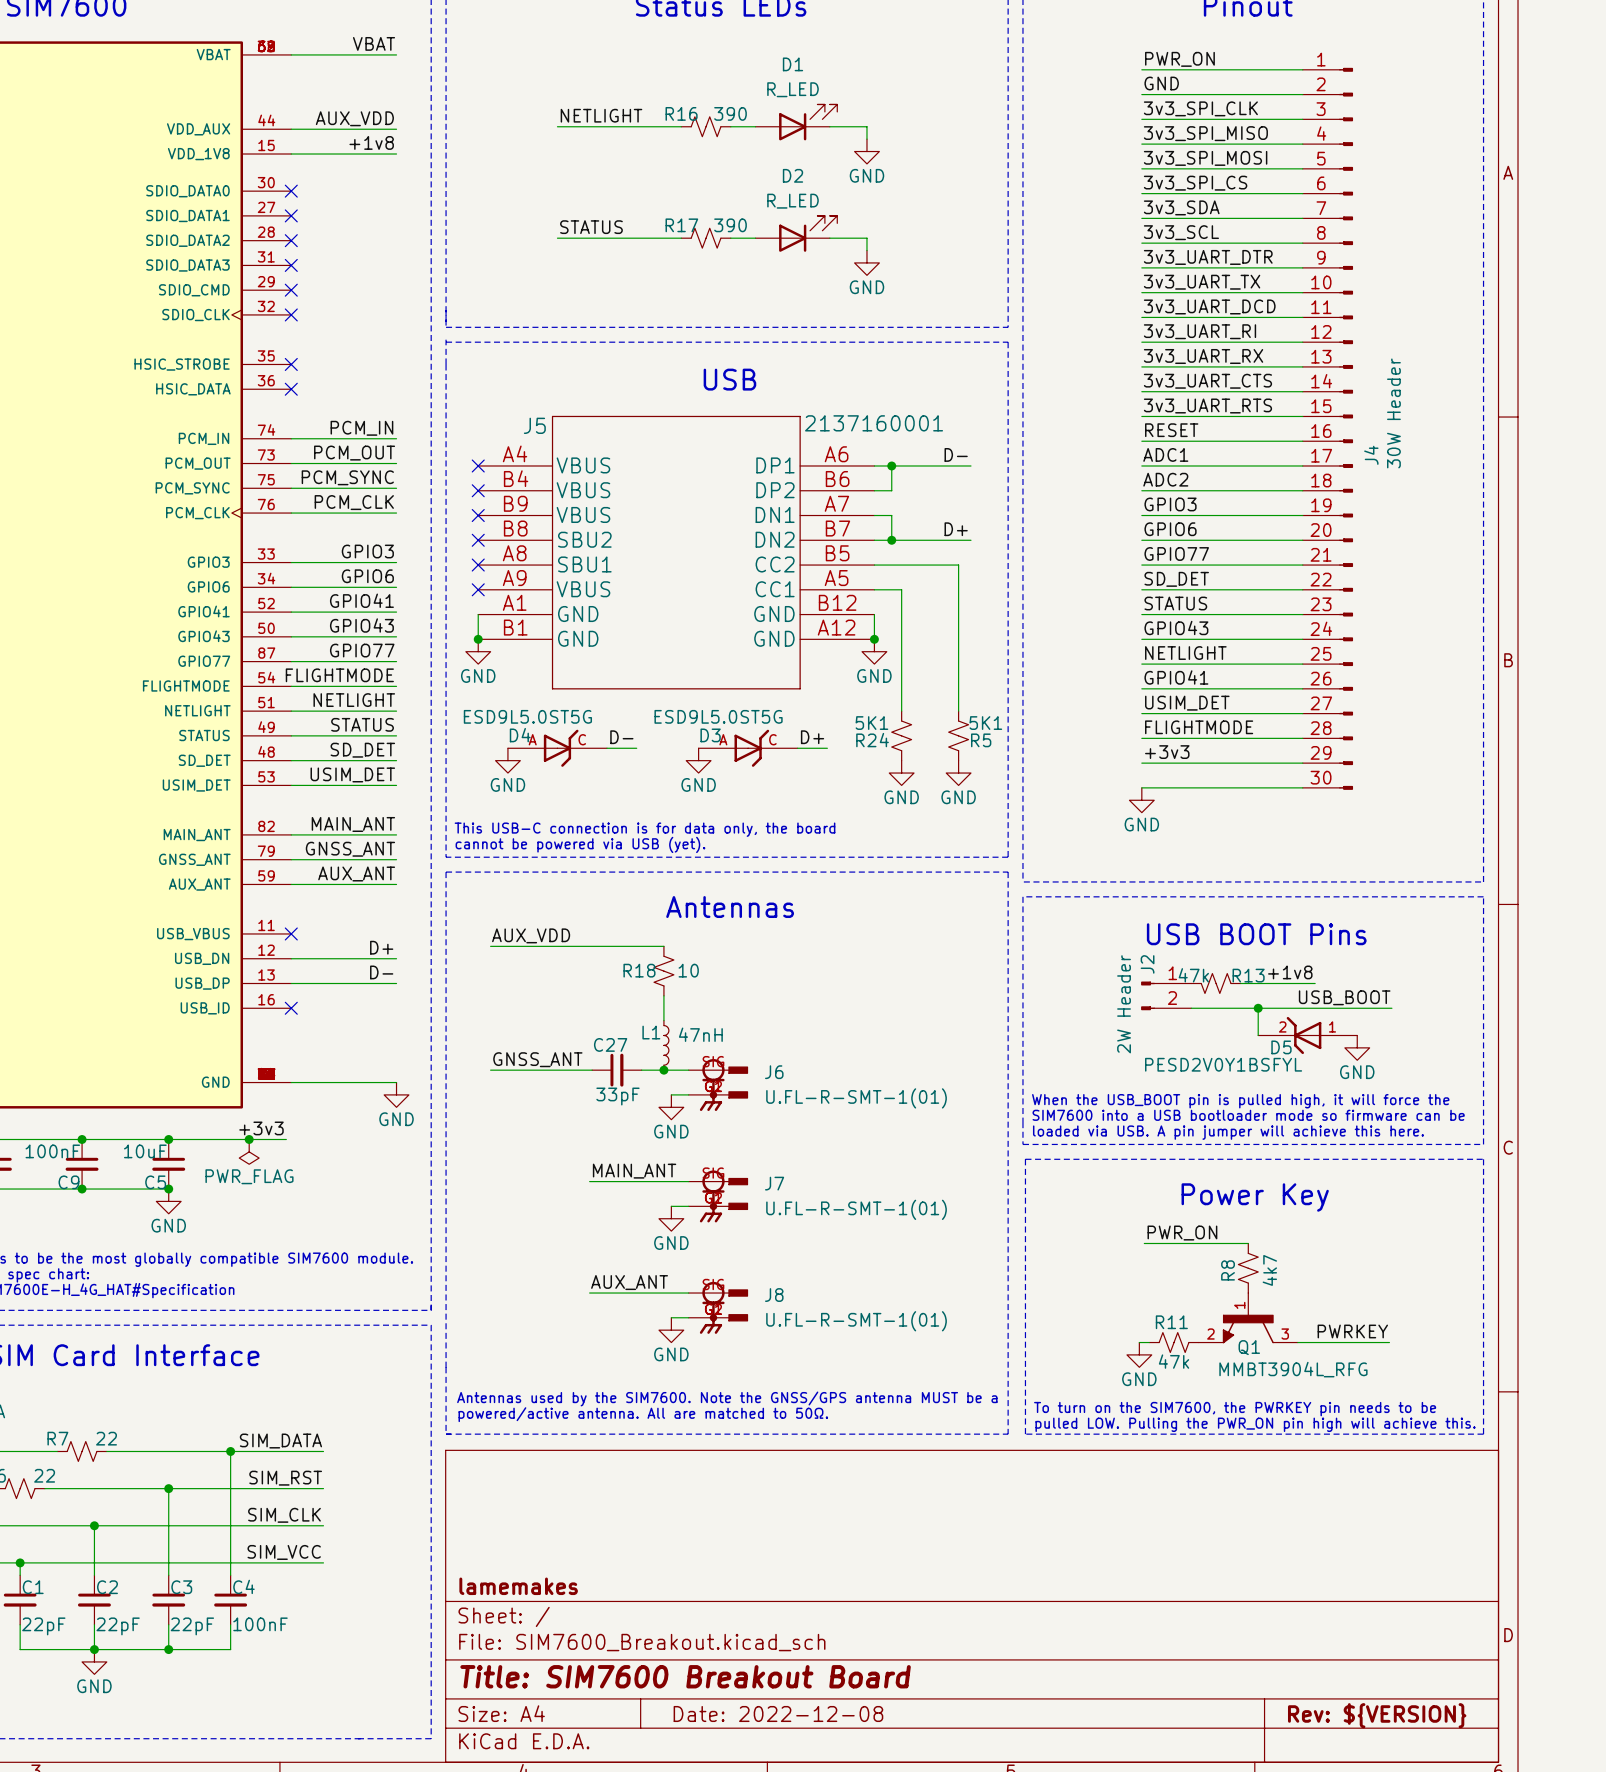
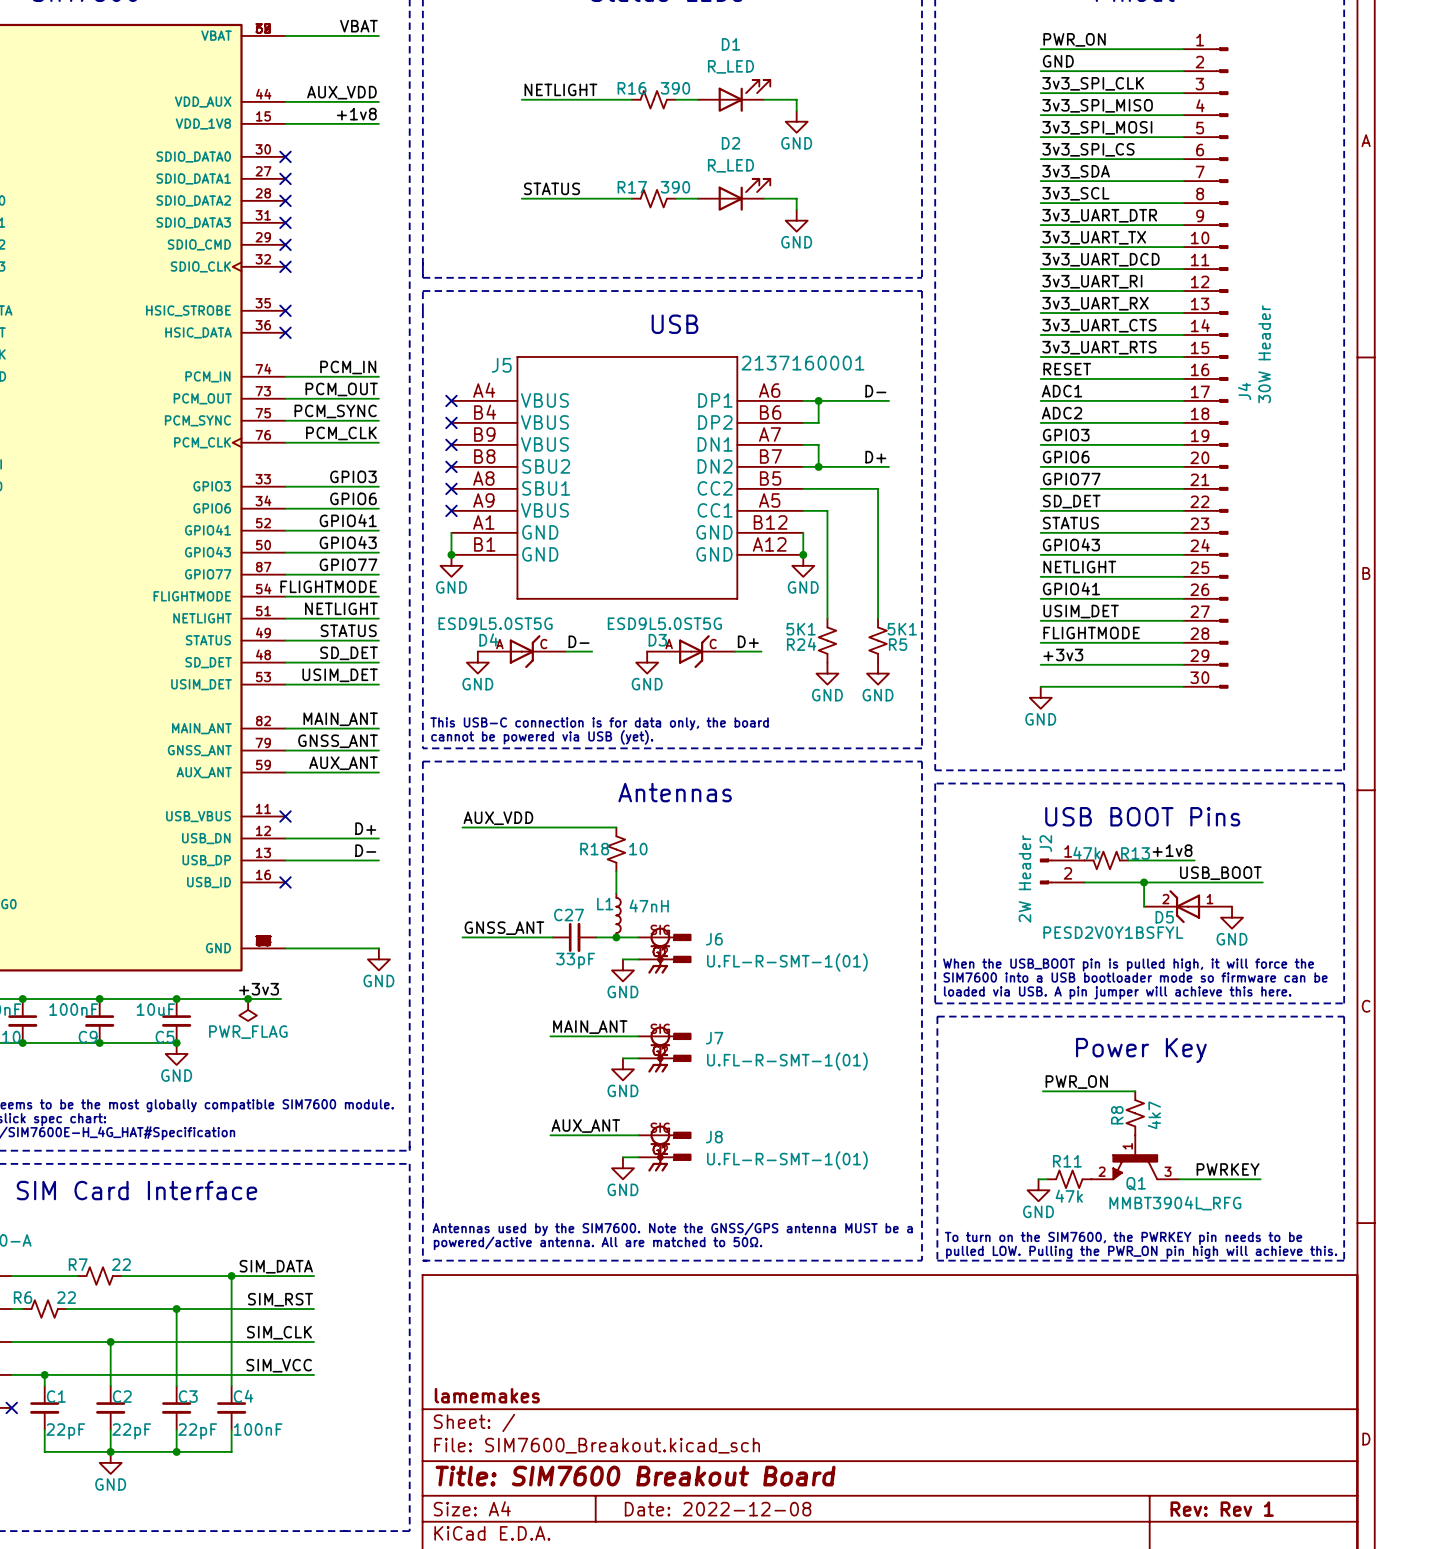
title block: Rev: ${VERSION} (1377, 1715) -> Rev: Rev 1 (1222, 1509)

